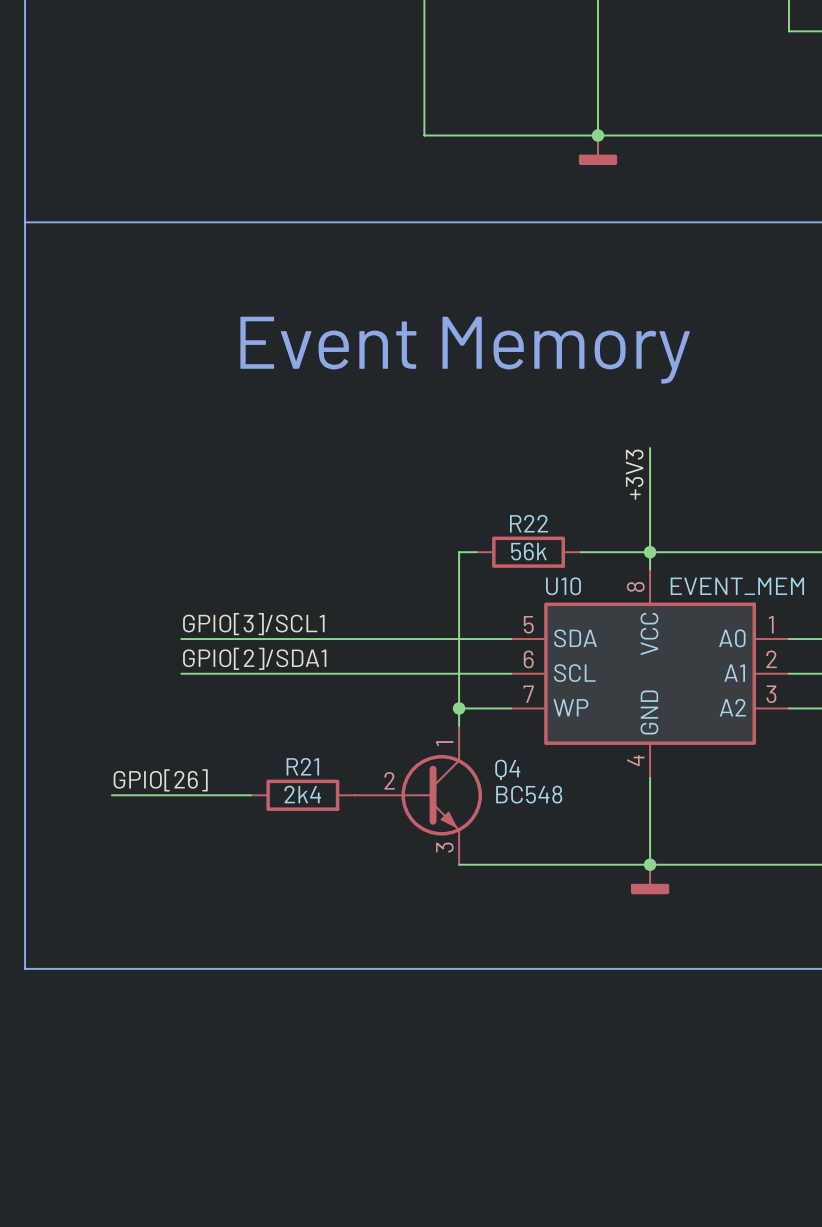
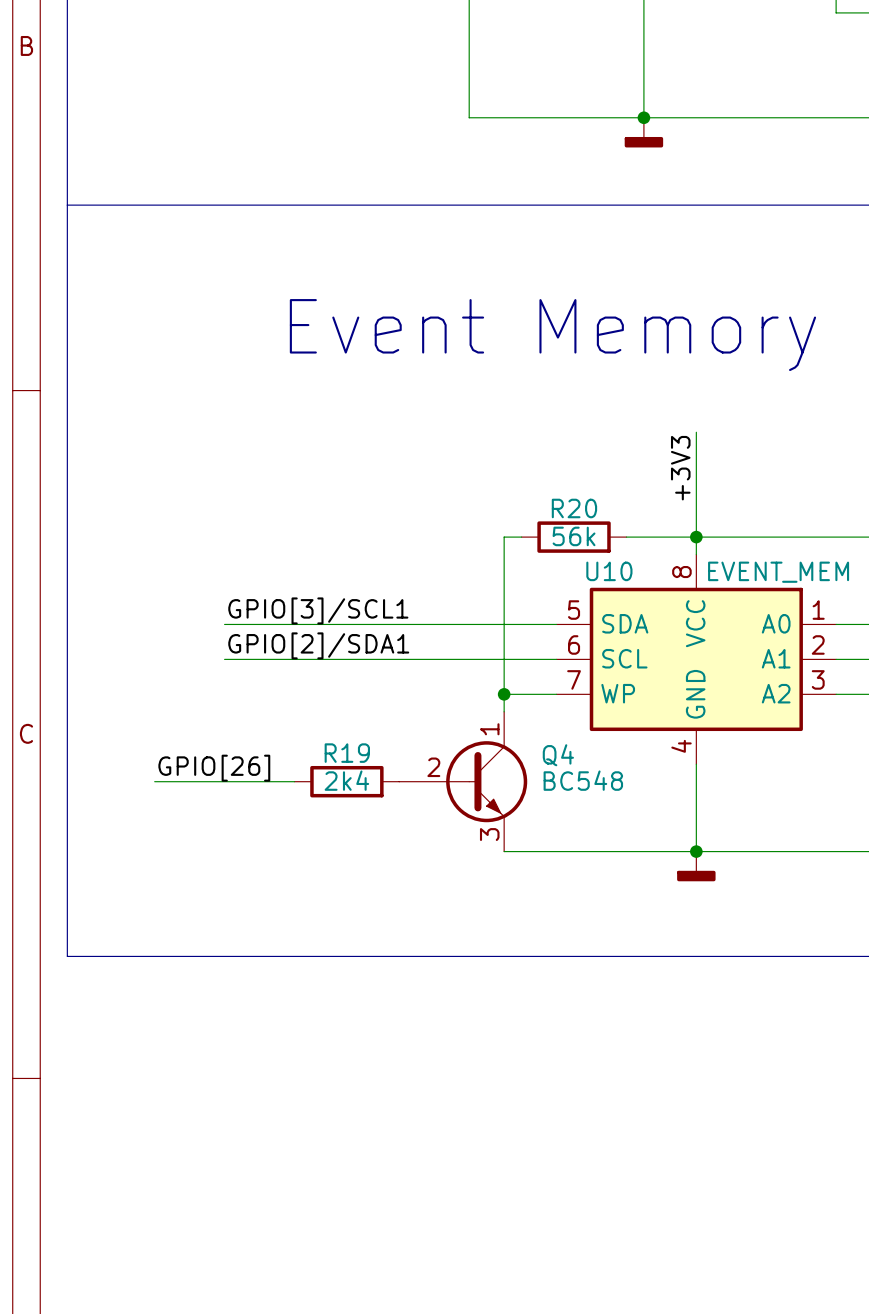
R22 name: R22 (529, 523) -> R20 (574, 508)
R21 name: R21 (302, 766) -> R19 (347, 753)

